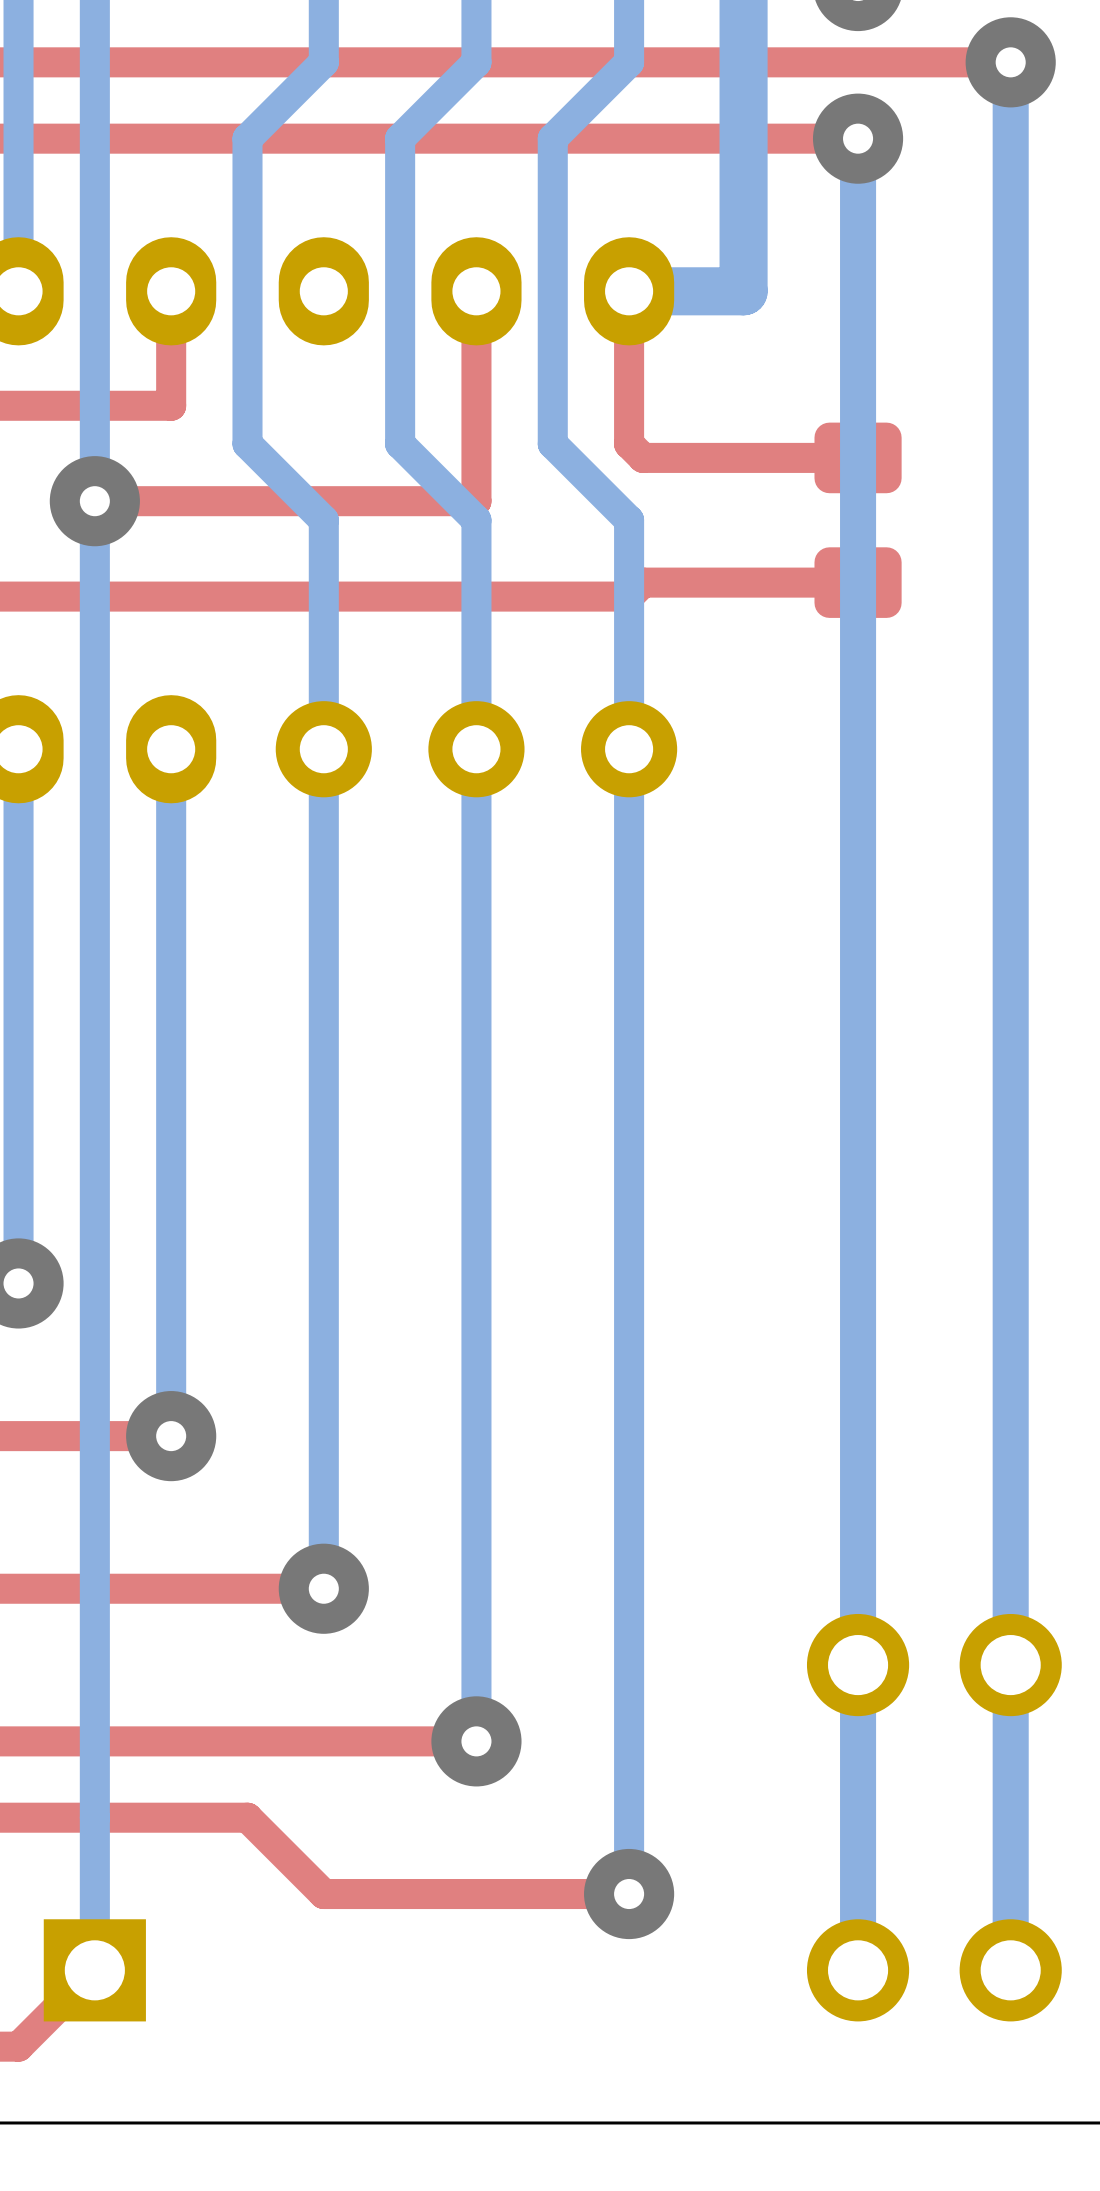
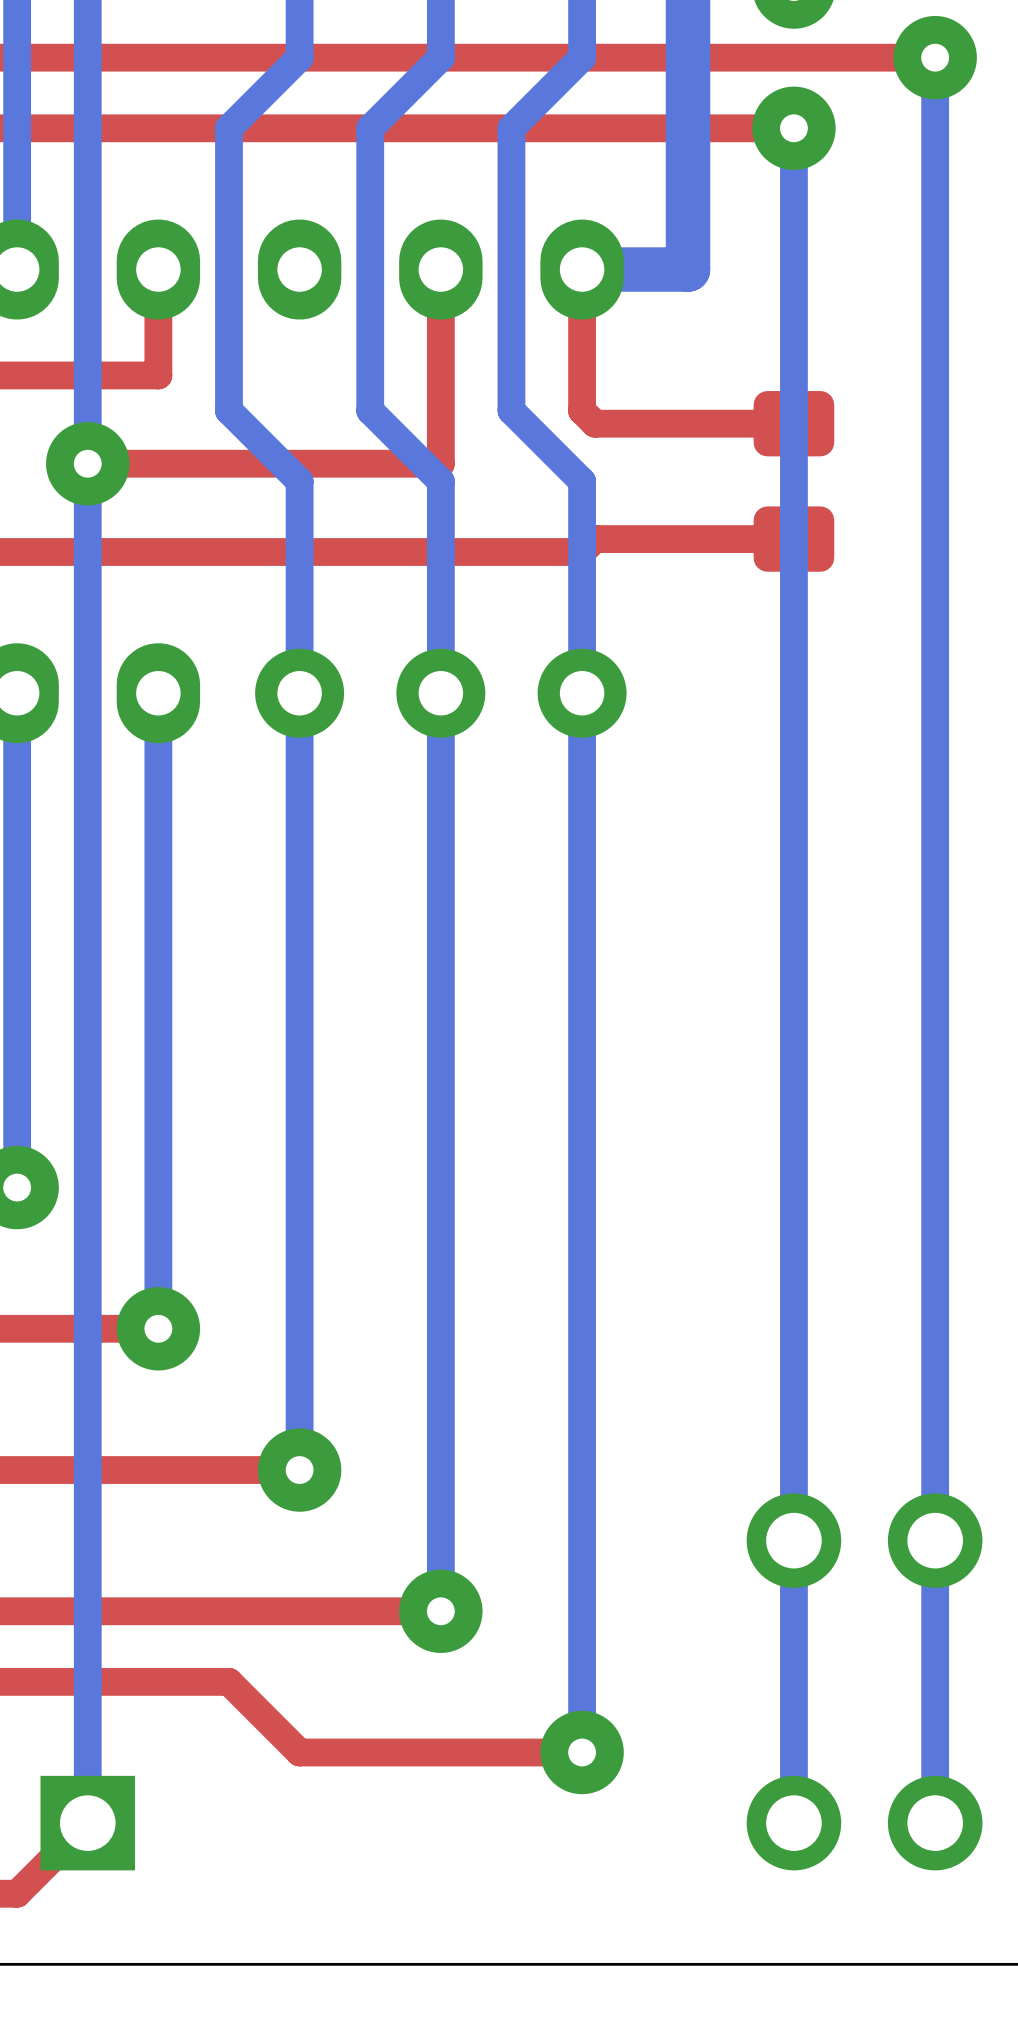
bottom track width: thick (1010, 62) (1010, 1970) -> thin (935, 57) (935, 1823)
bottom track width: thick (858, 138) (858, 1970) -> thin (793, 128) (793, 1823)

